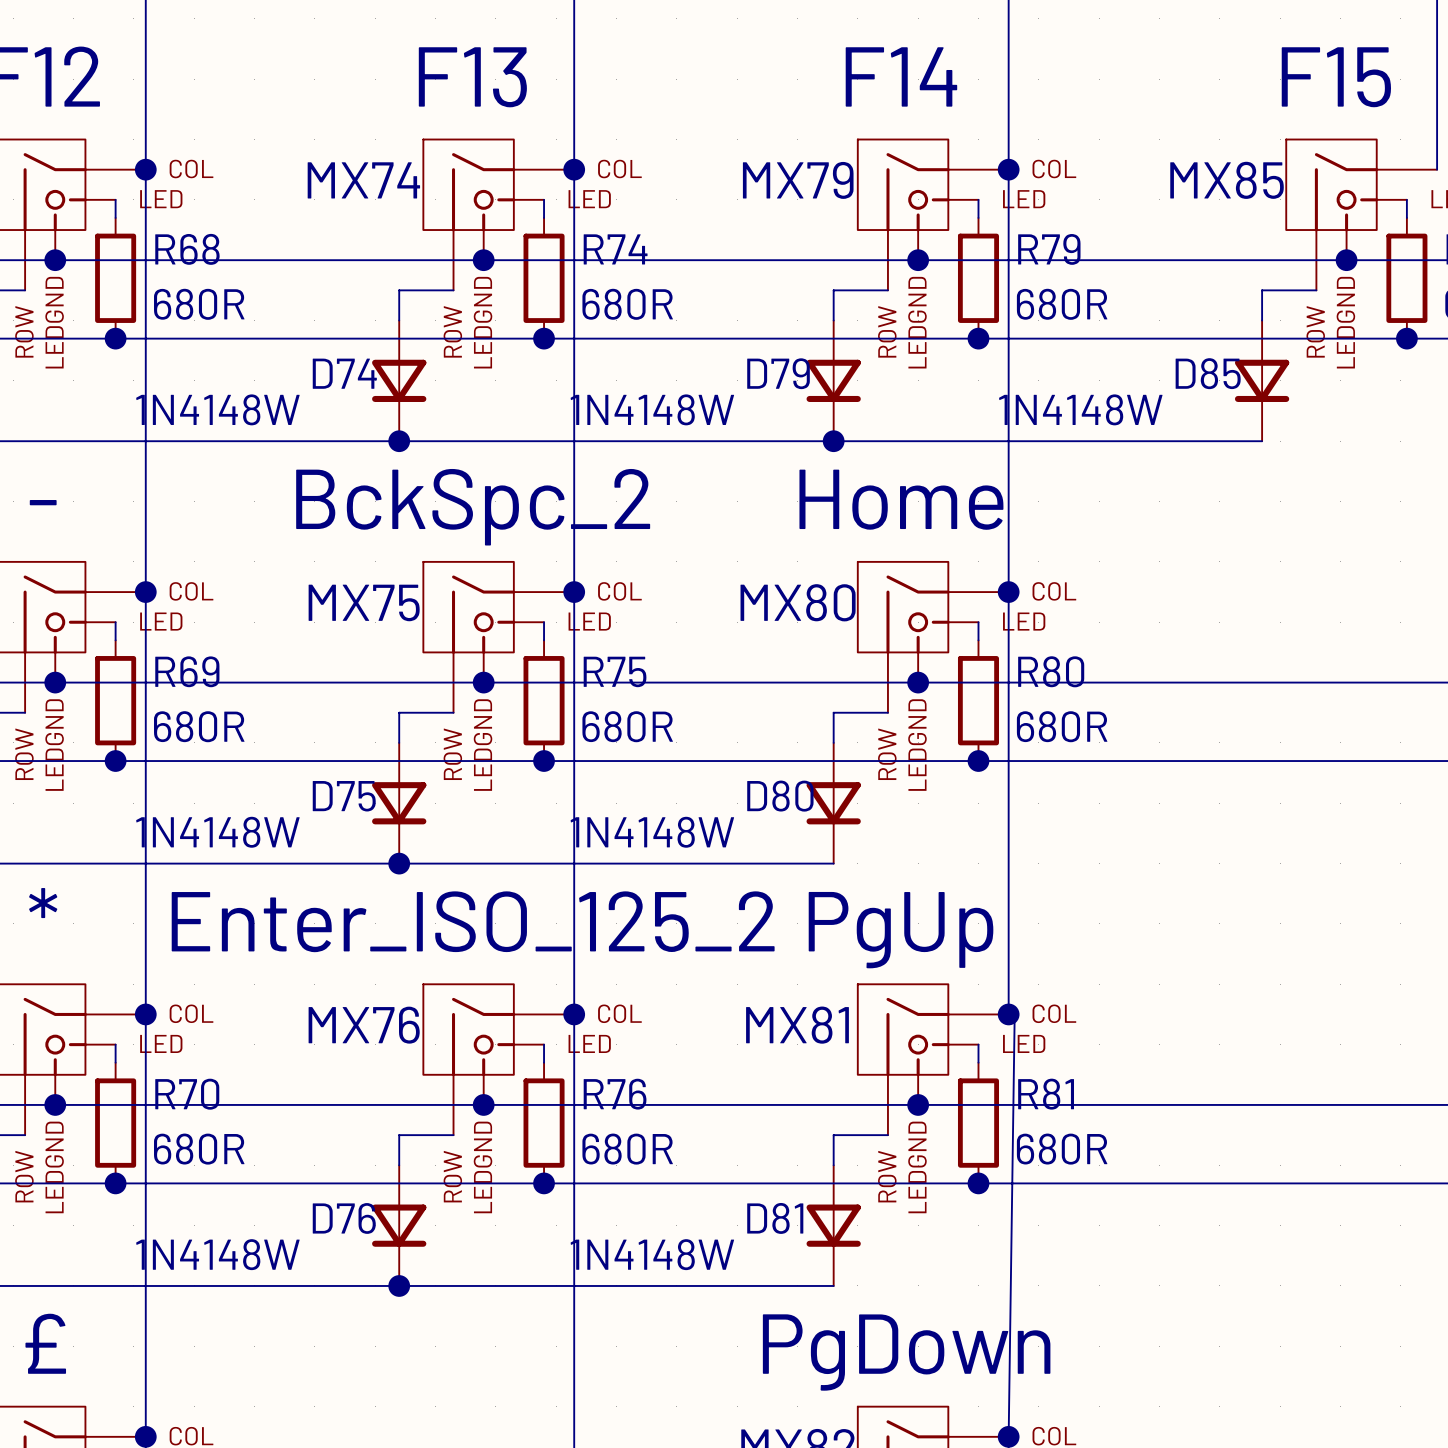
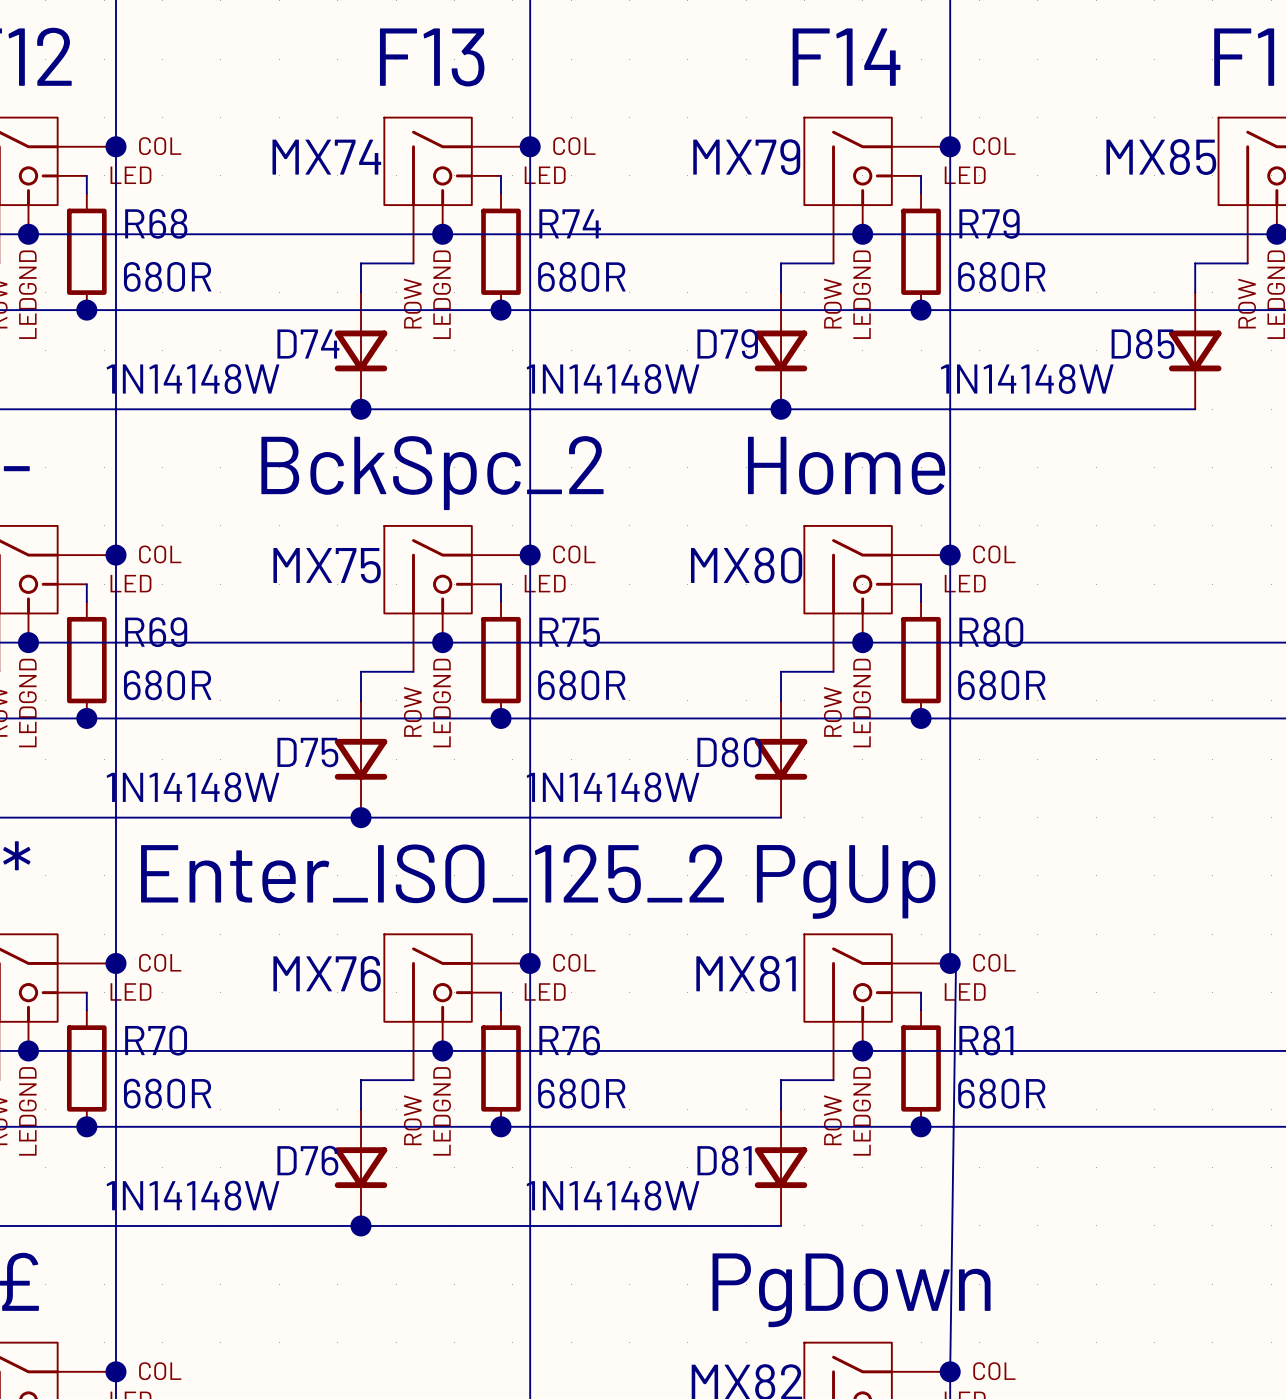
D74 value: 1N4148W (217, 409) -> 1N14148W (193, 378)
D79 value: 1N4148W (652, 409) -> 1N14148W (613, 378)
D85 value: 1N4148W (1080, 409) -> 1N14148W (1027, 378)
D75 value: 1N4148W (217, 832) -> 1N14148W (193, 787)
D80 value: 1N4148W (652, 832) -> 1N14148W (613, 787)
D76 value: 1N4148W (217, 1254) -> 1N14148W (193, 1195)
D81 value: 1N4148W (652, 1254) -> 1N14148W (613, 1195)

